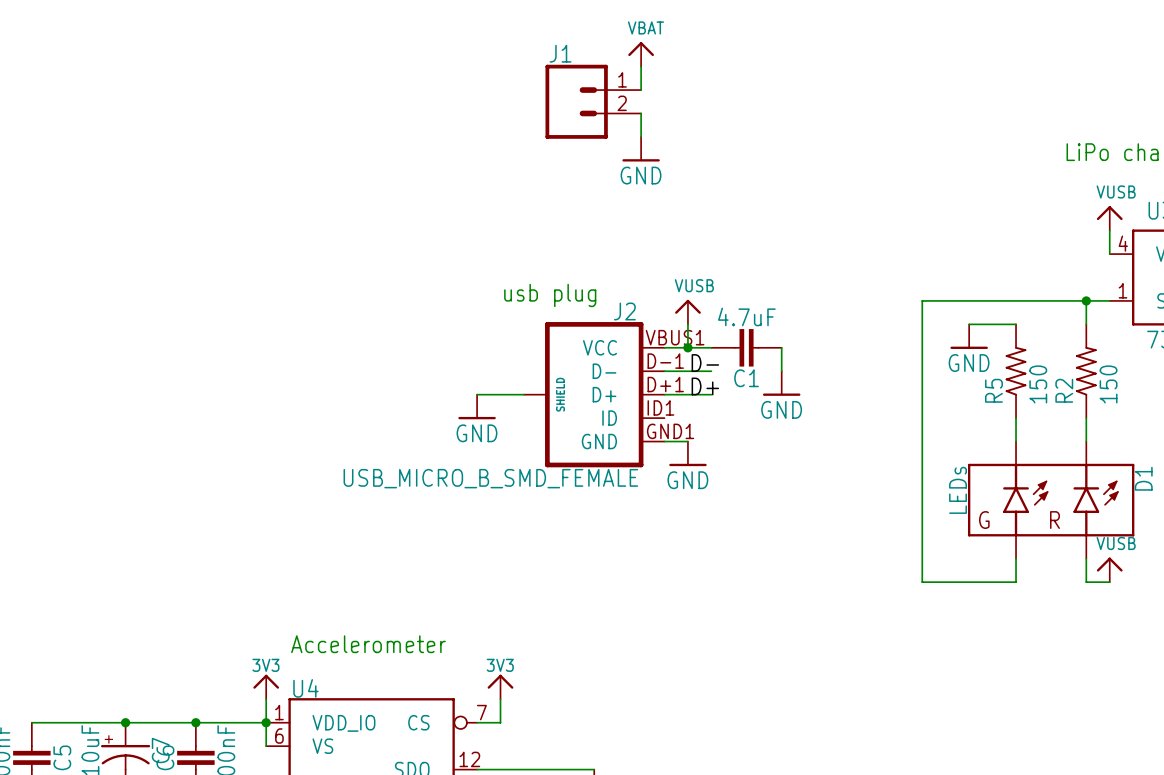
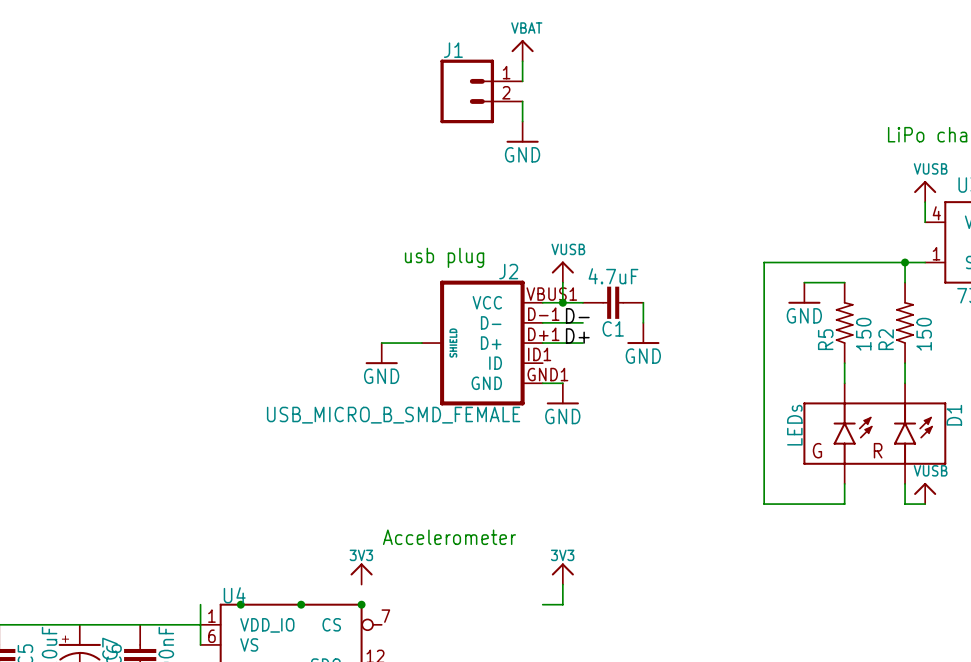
text position: Accelerometer (368, 644) -> Accelerometer (449, 537)
power symbol: none -> 3V3 (562, 573)
power symbol: 3V3 (266, 686) -> none
power symbol position: 3V3 (500, 686) -> 3V3 (361, 573)
junction: none -> (301, 604)
junction: none -> (361, 604)
wire: (500, 699) (500, 722) (477, 722) -> (562, 584) (562, 604) (542, 604)
junction: (125, 722) -> none
junction: (195, 722) -> none
junction position: (266, 722) -> (240, 604)

